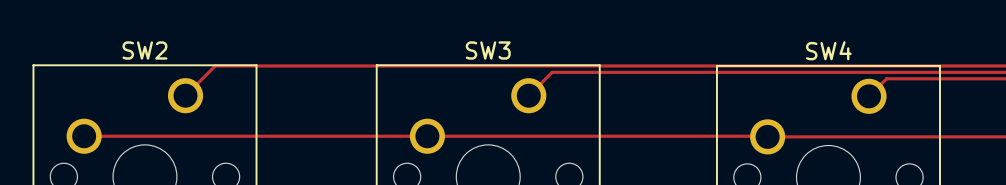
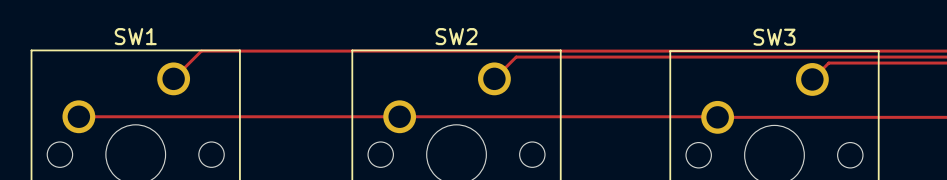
SW2 name: SW2 (144, 50) -> SW1 (135, 36)
SW3 name: SW3 (488, 50) -> SW2 (456, 36)
SW4 name: SW4 (828, 50) -> SW3 (774, 37)

